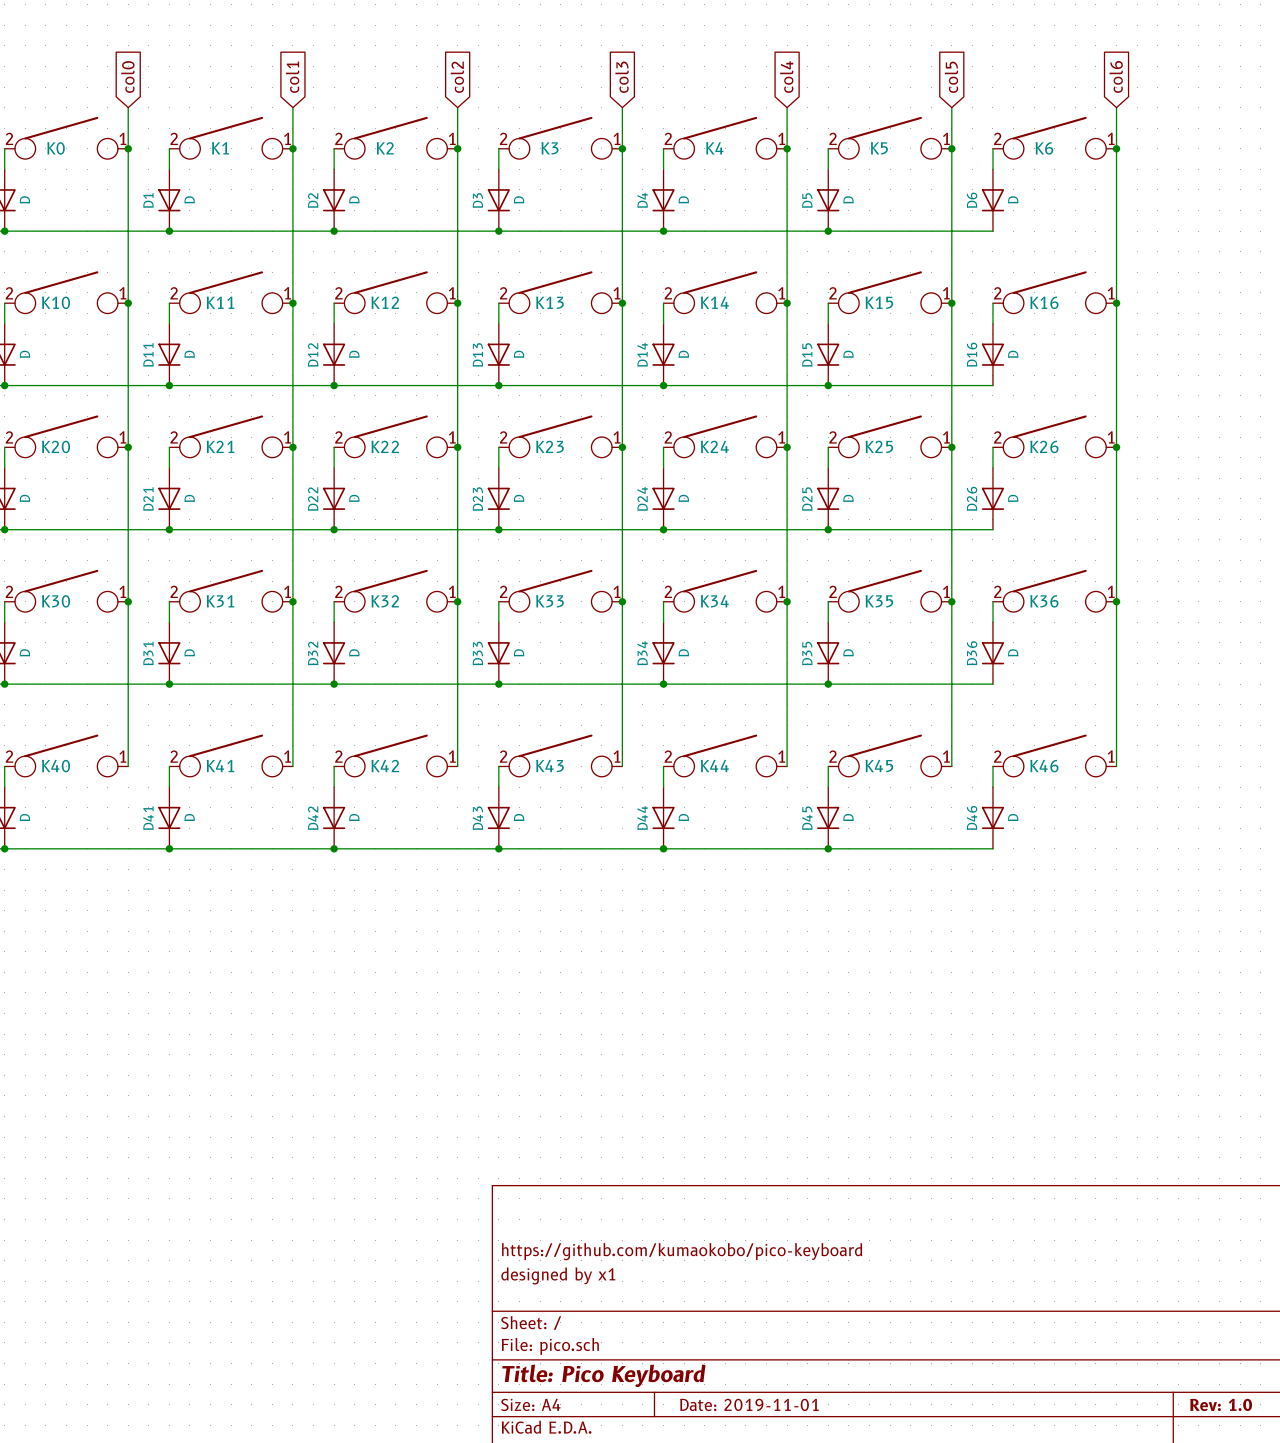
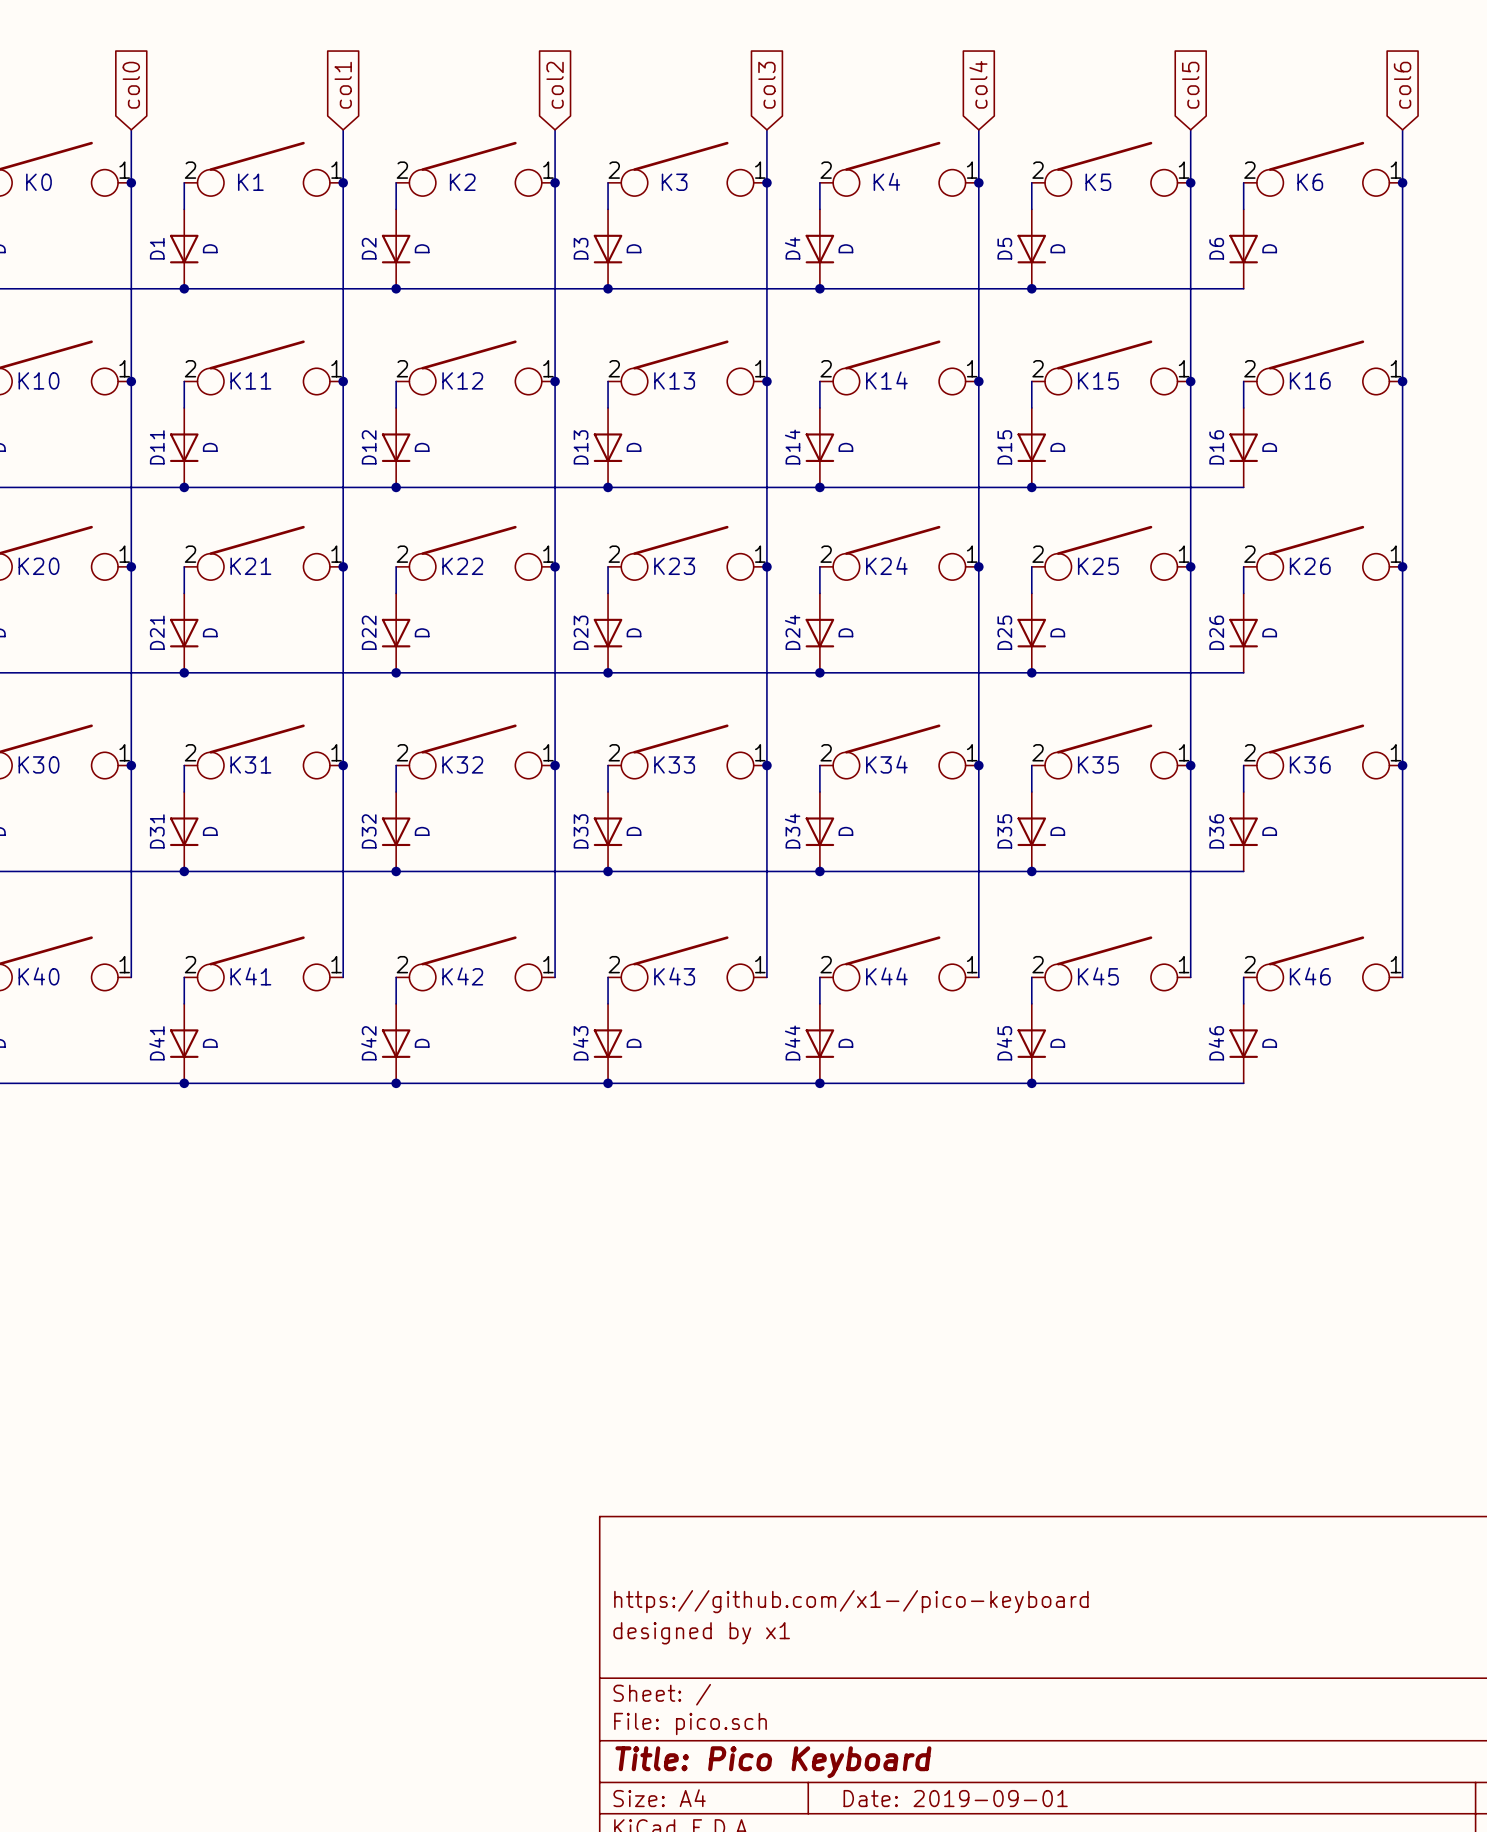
title block: https://github.com/kumaokobo/pico-keyboard (682, 1251) -> https://github.com/x1-/pico-keyboard (851, 1601)
title block: Date: 2019-11-01 (749, 1404) -> Date: 2019-09-01 (955, 1798)

